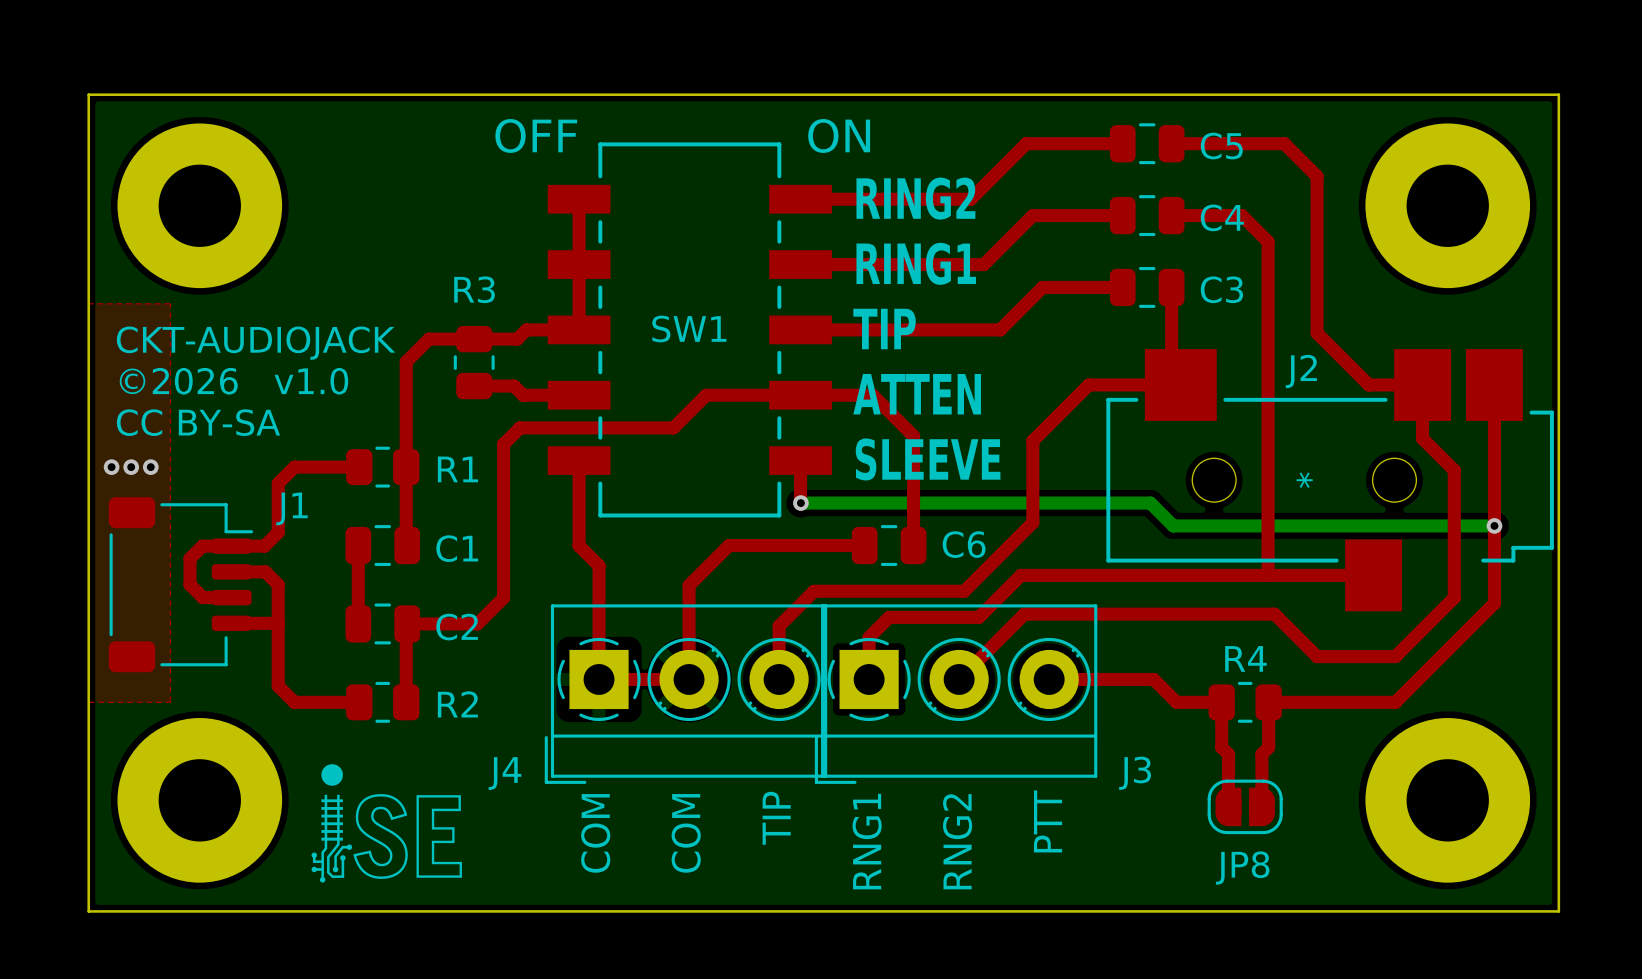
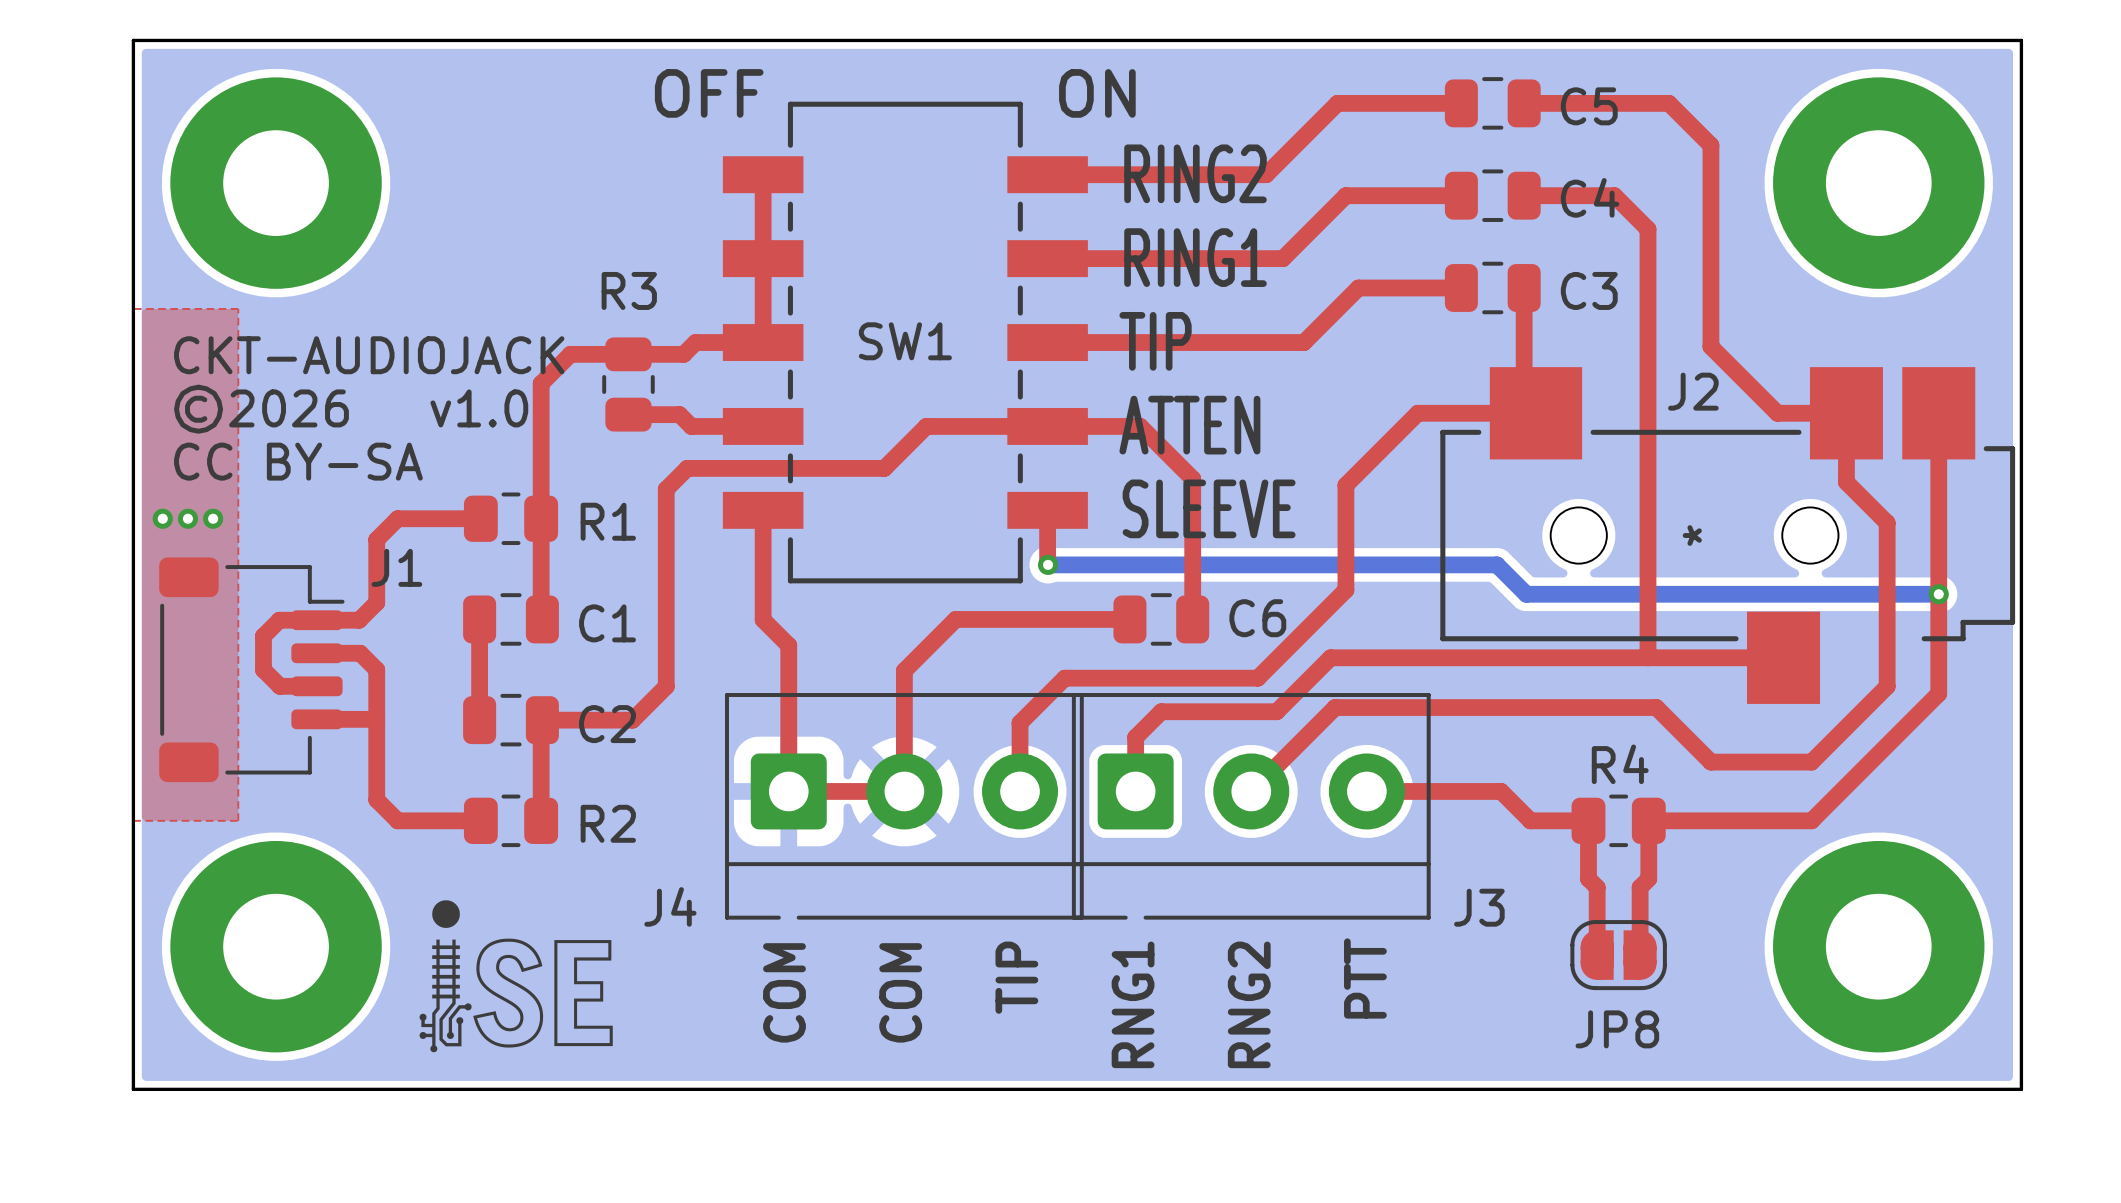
J4 footprint: [544, 604, 828, 784] -> [725, 693, 1084, 920]
J3 footprint: [814, 604, 1098, 784] -> [1071, 693, 1431, 920]

